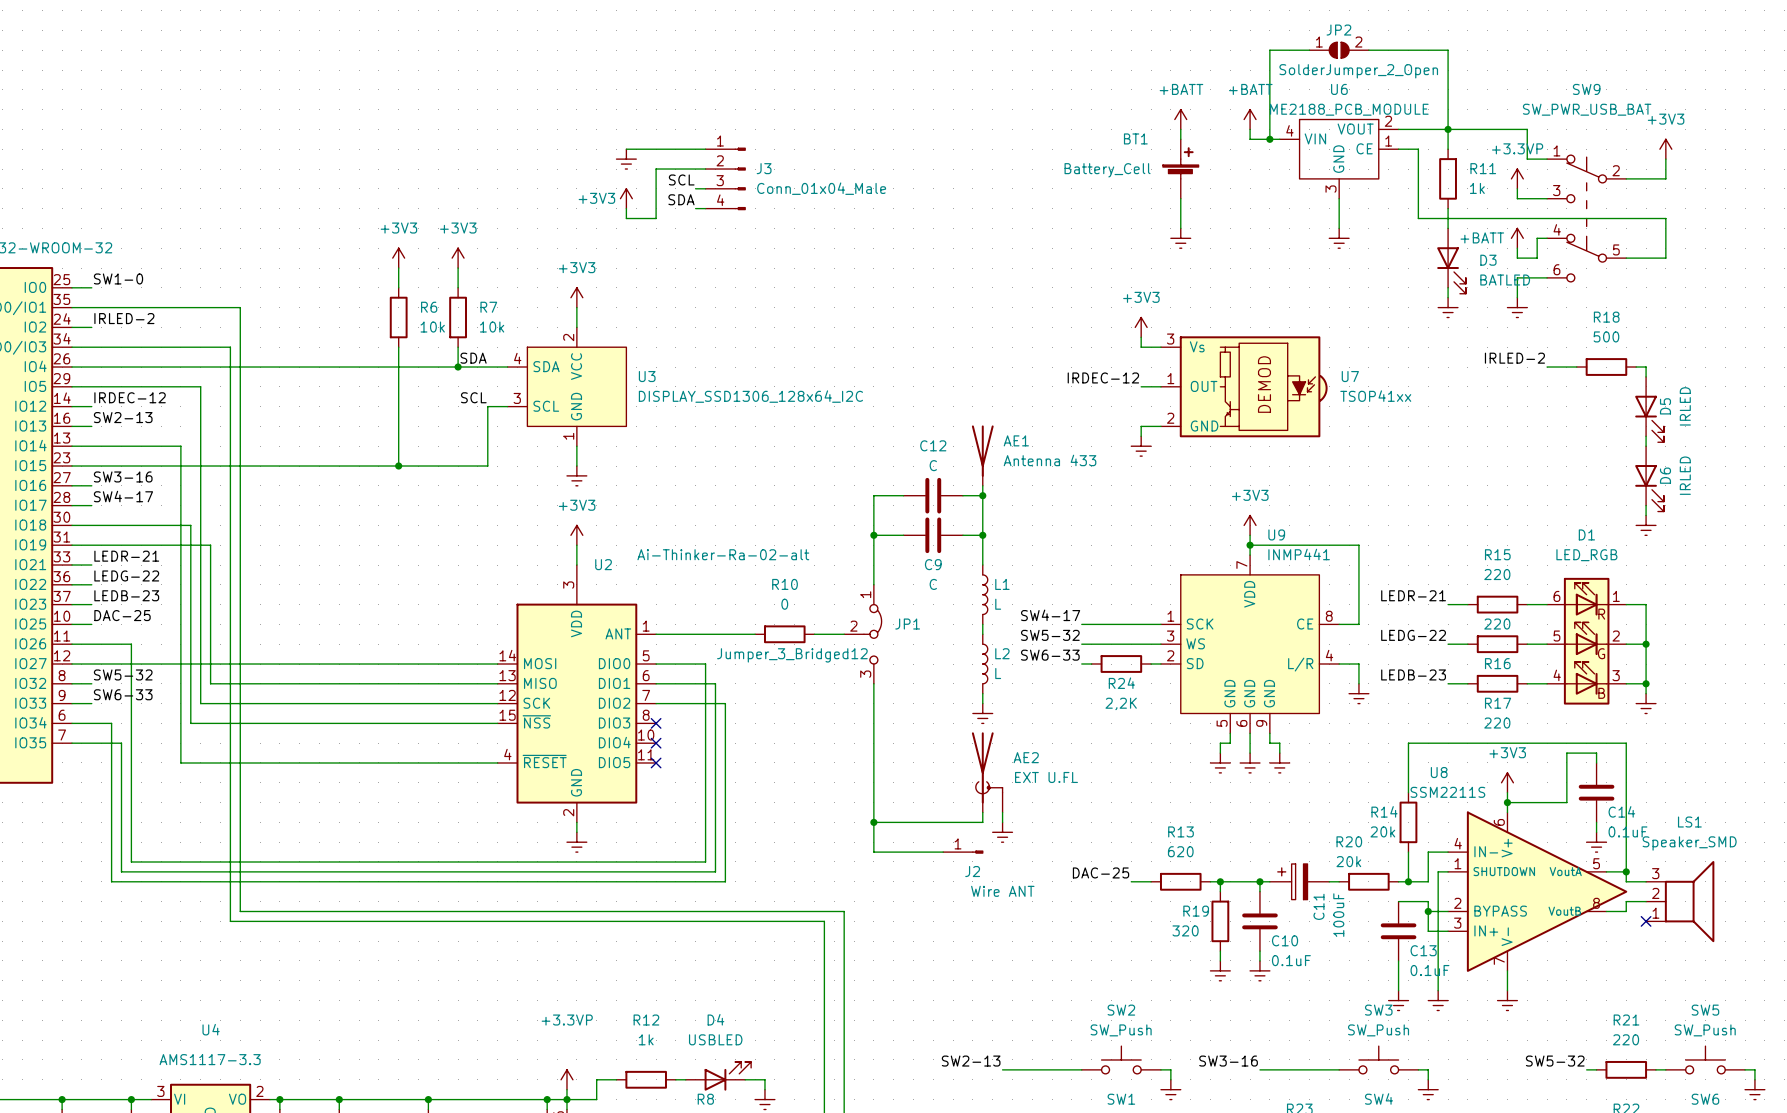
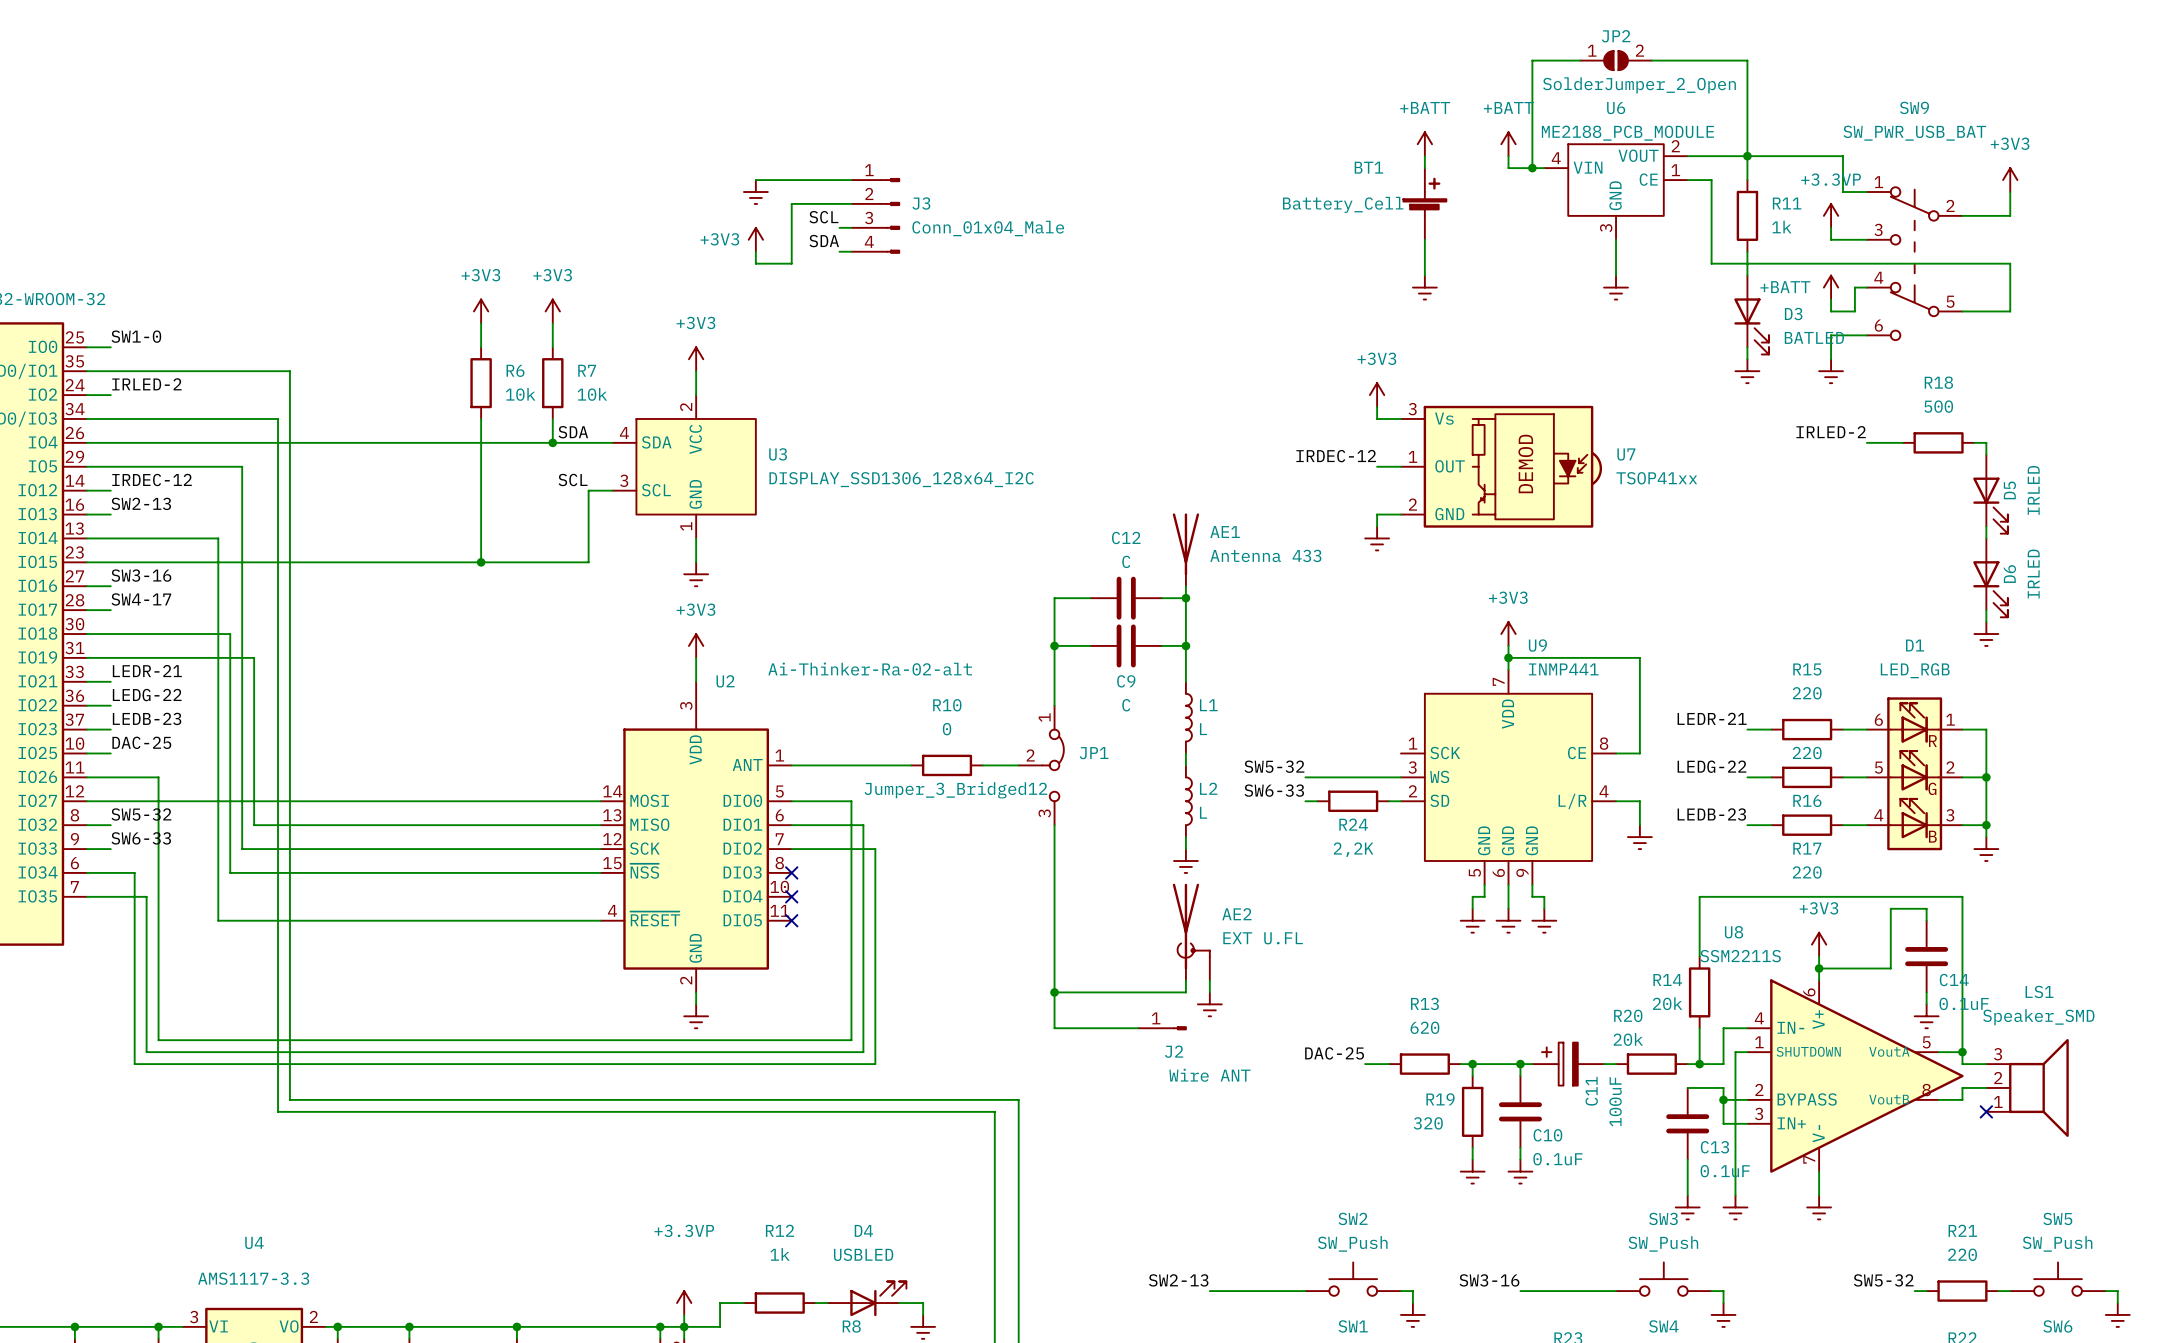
label: SW4-17 (1050, 615) -> none
wire: (1081, 624) (1160, 624) -> none

